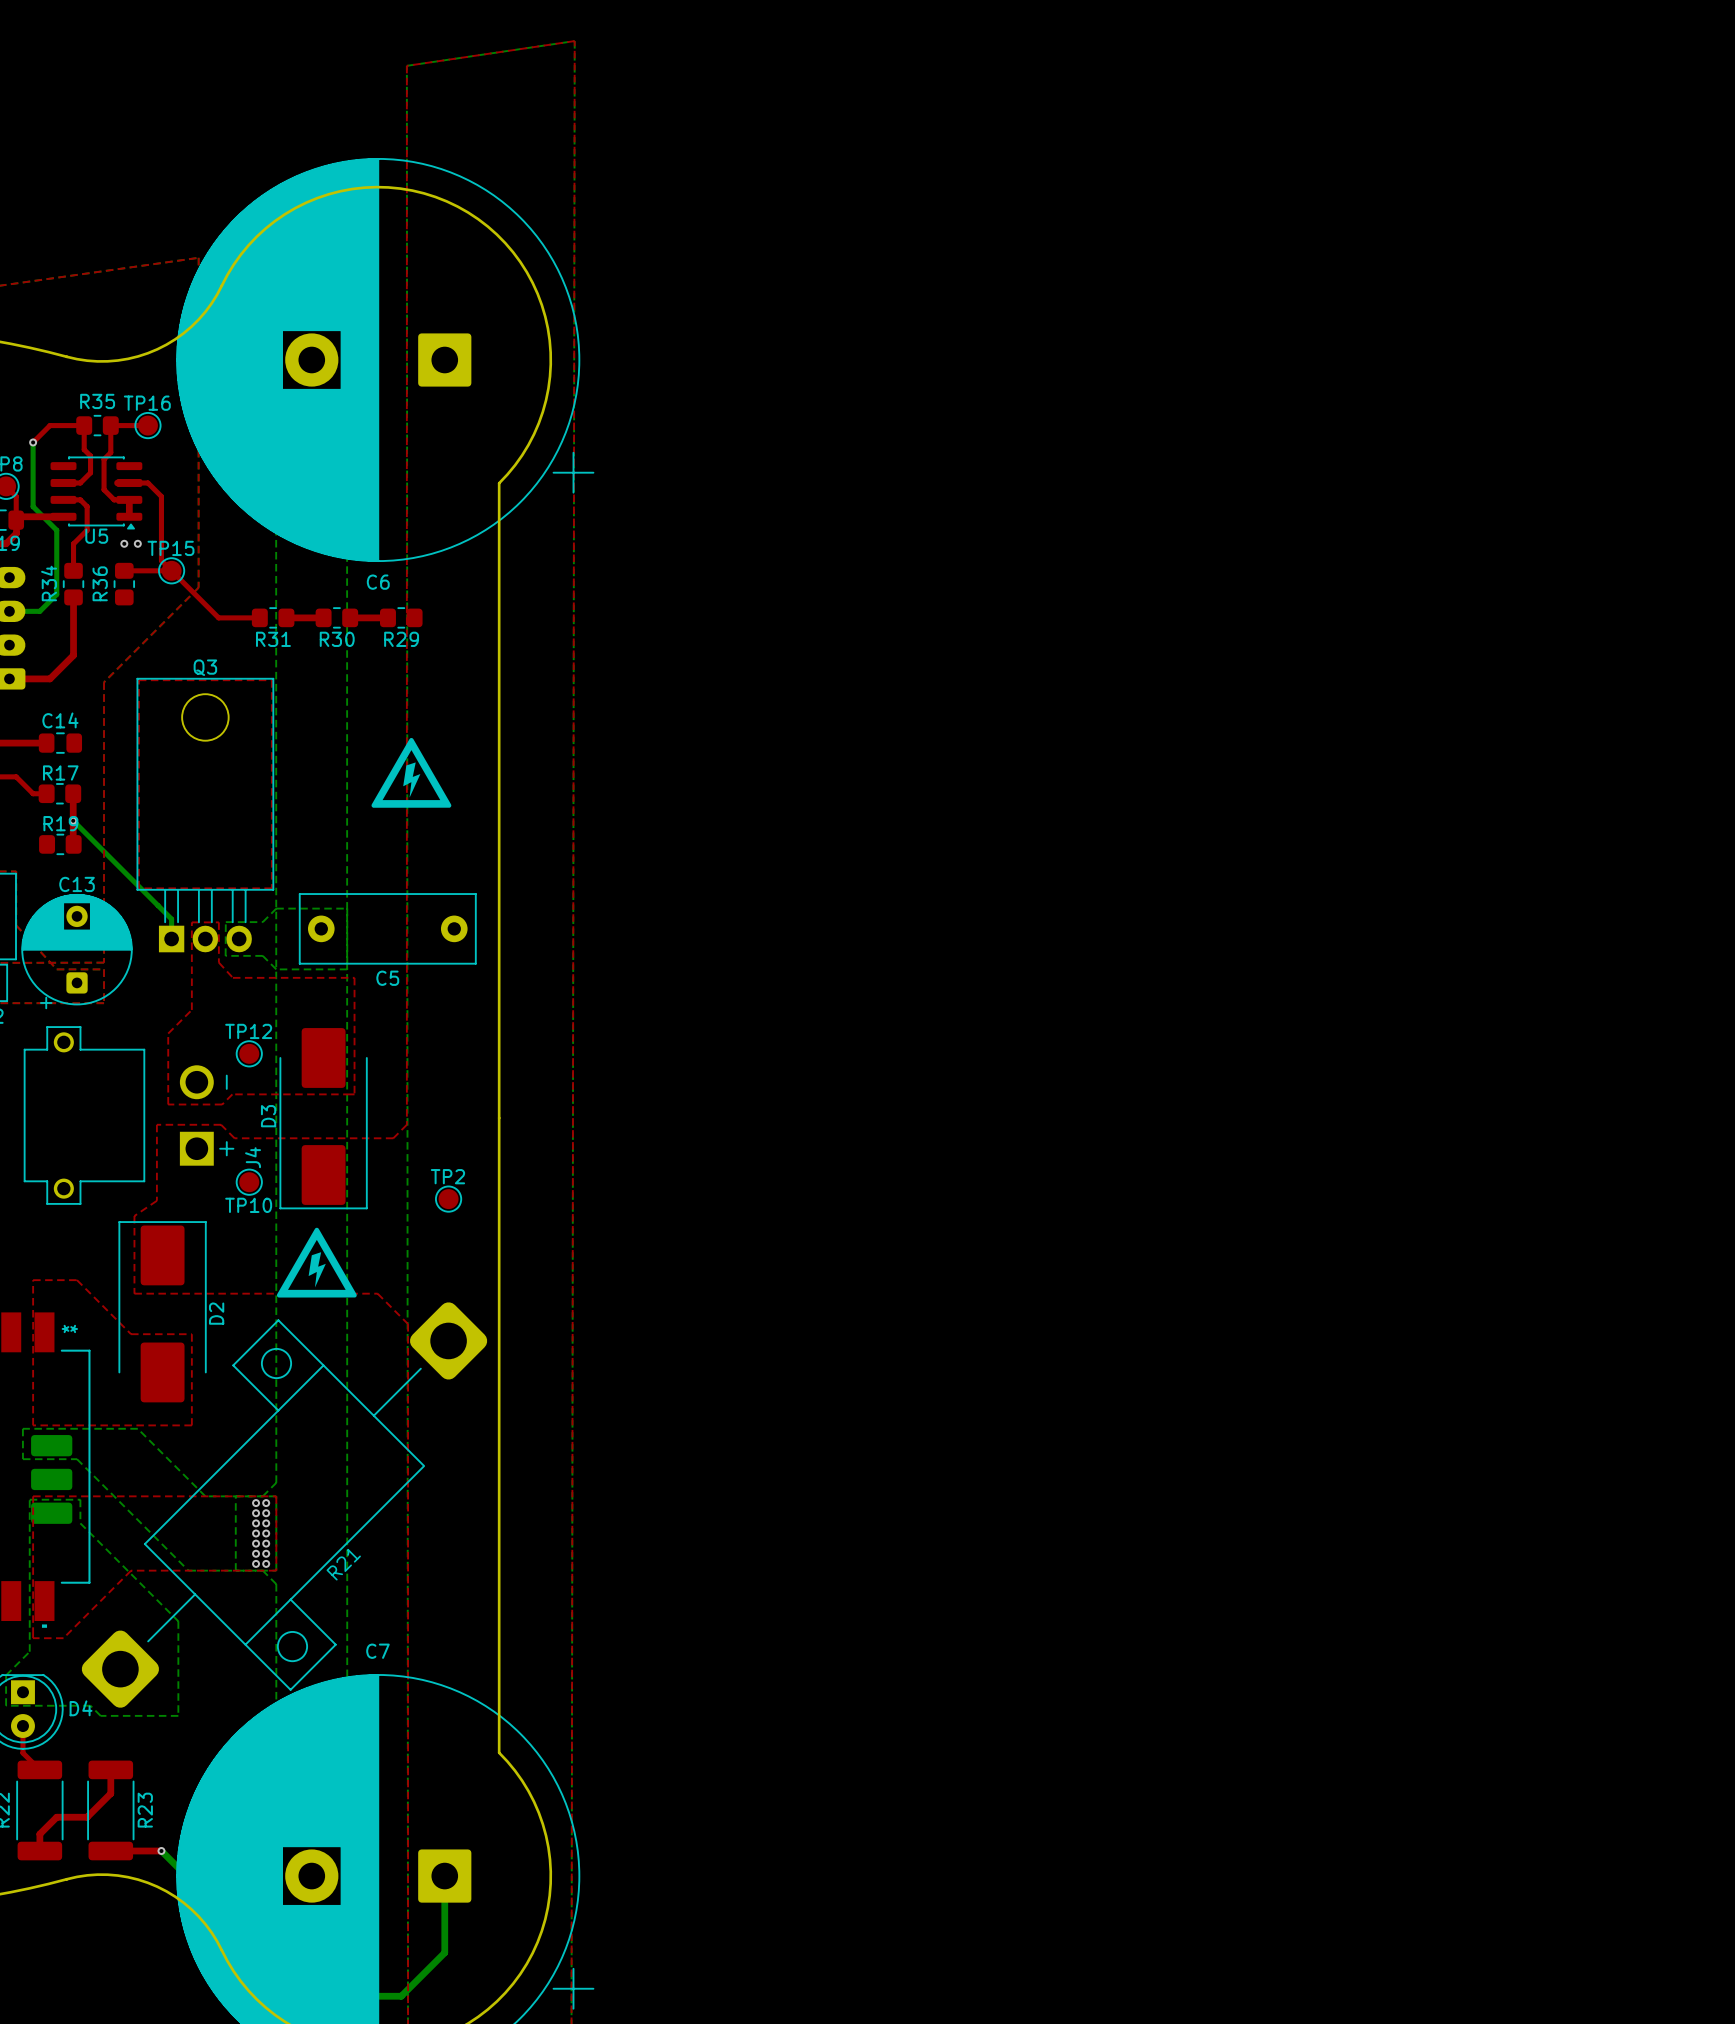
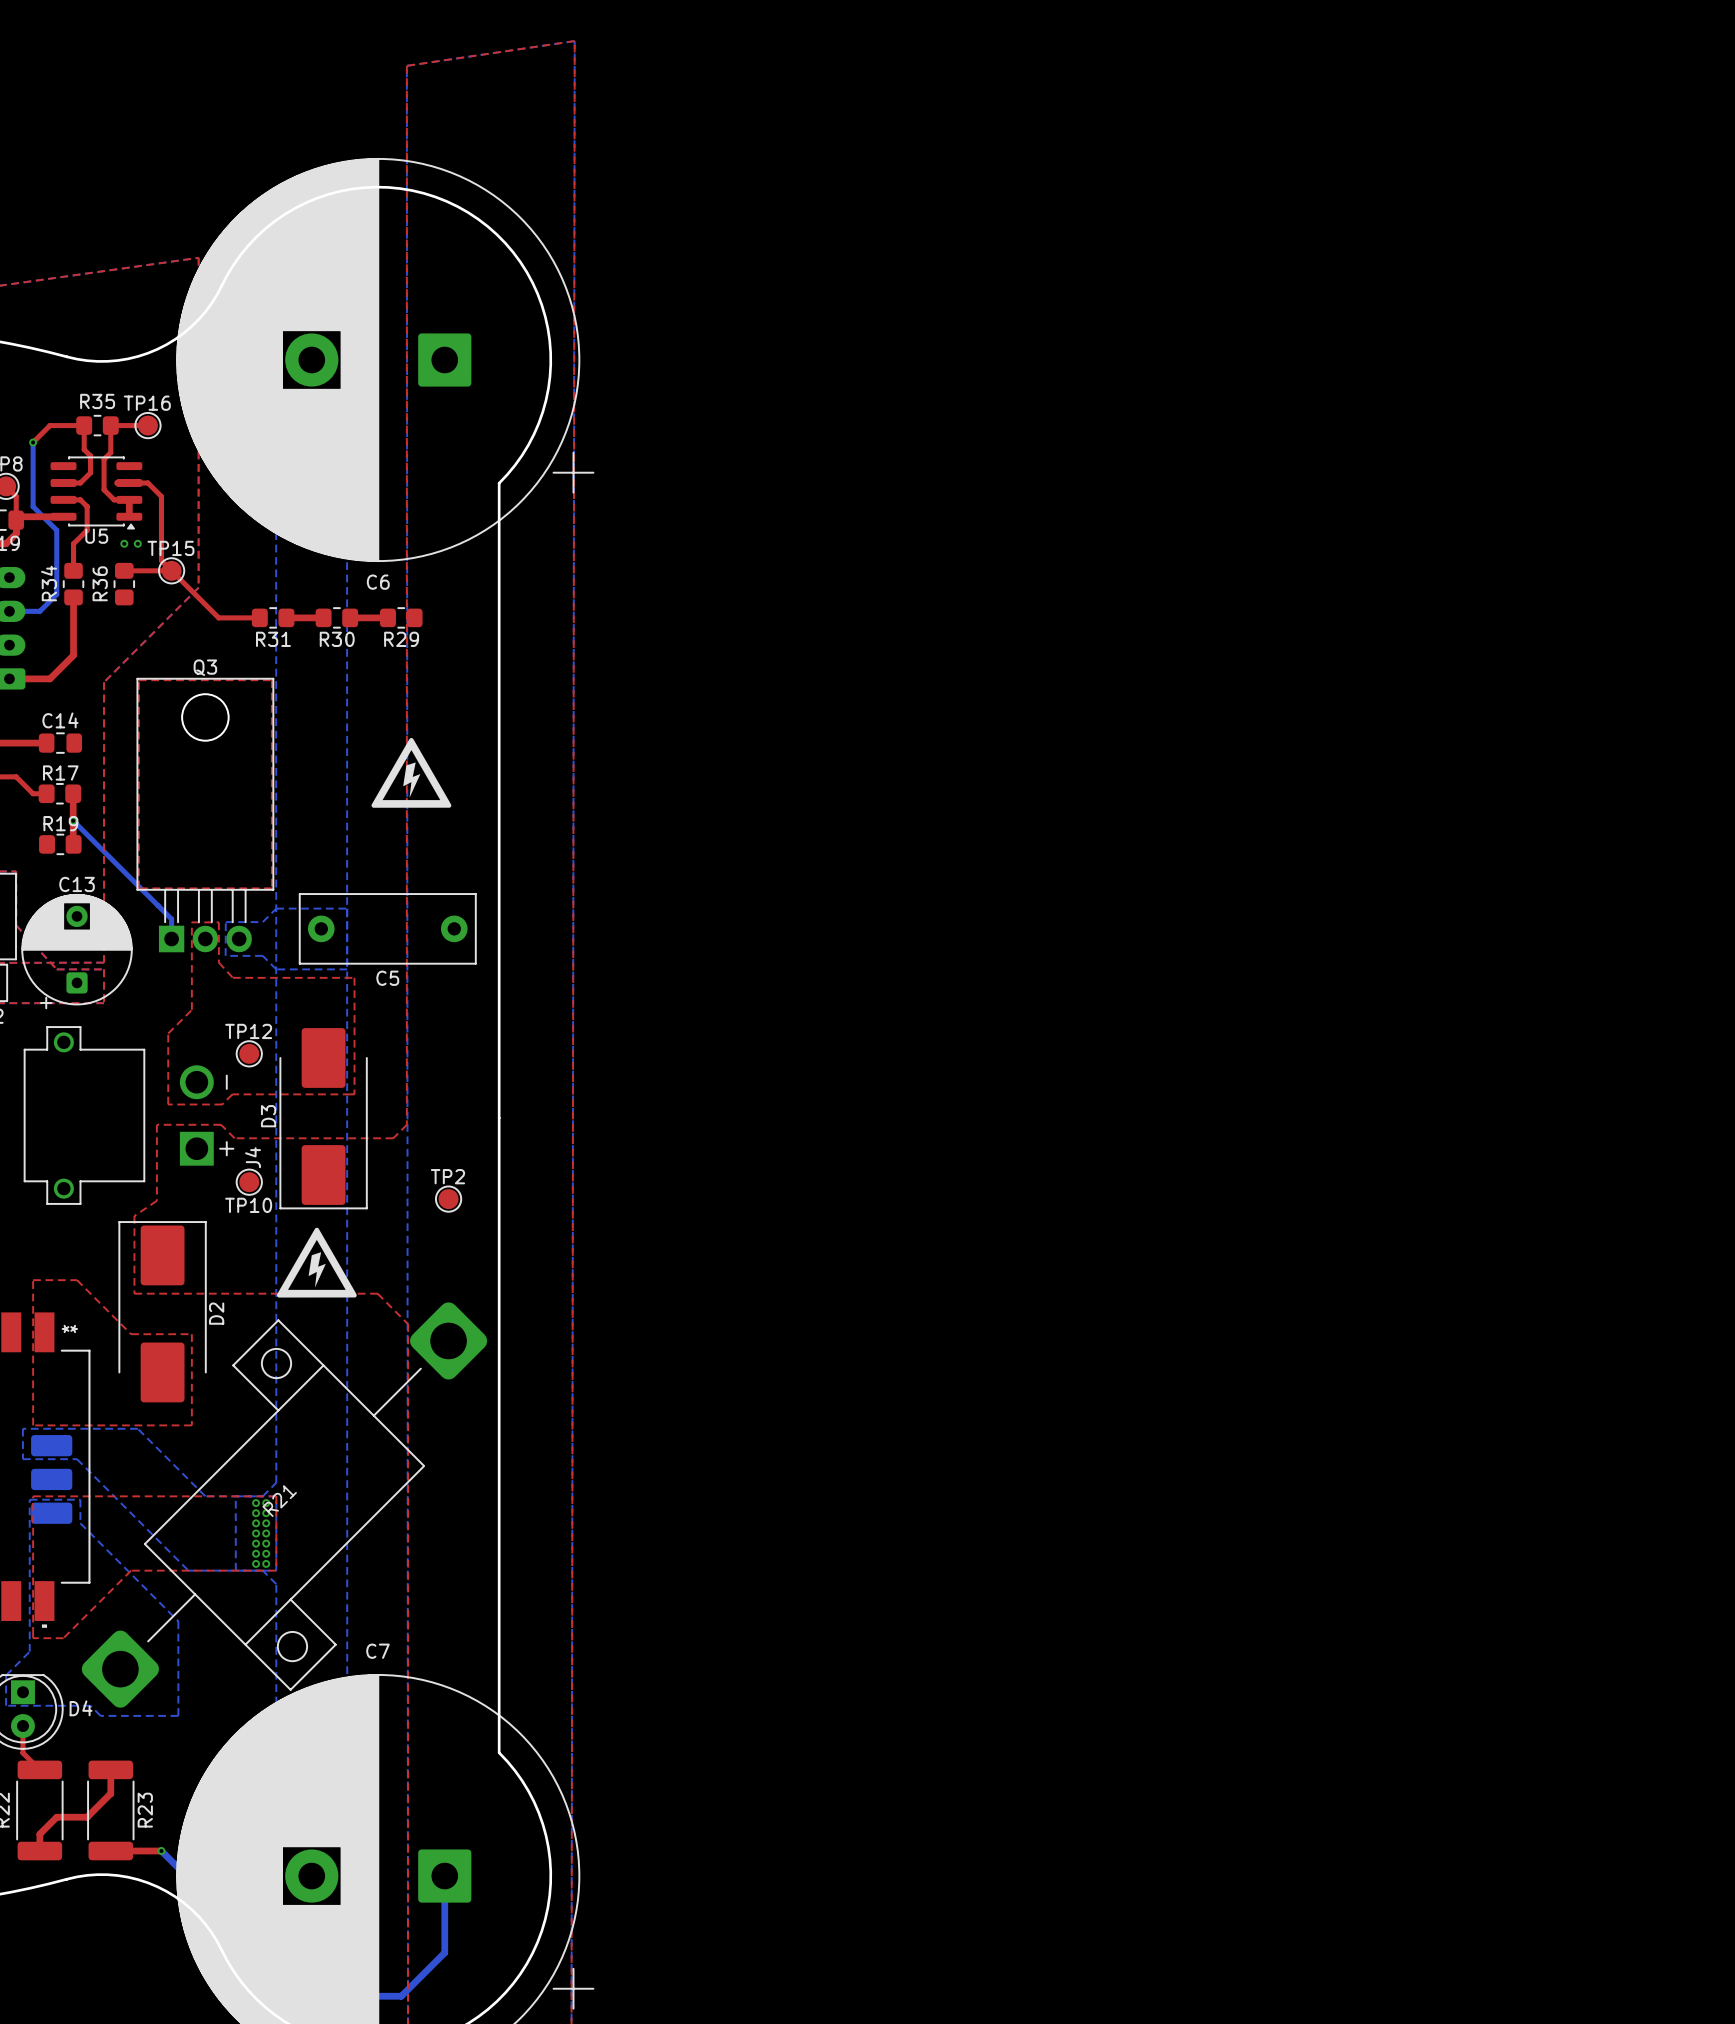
R21 name position: R21 (343, 1564) -> R21 (279, 1501)

